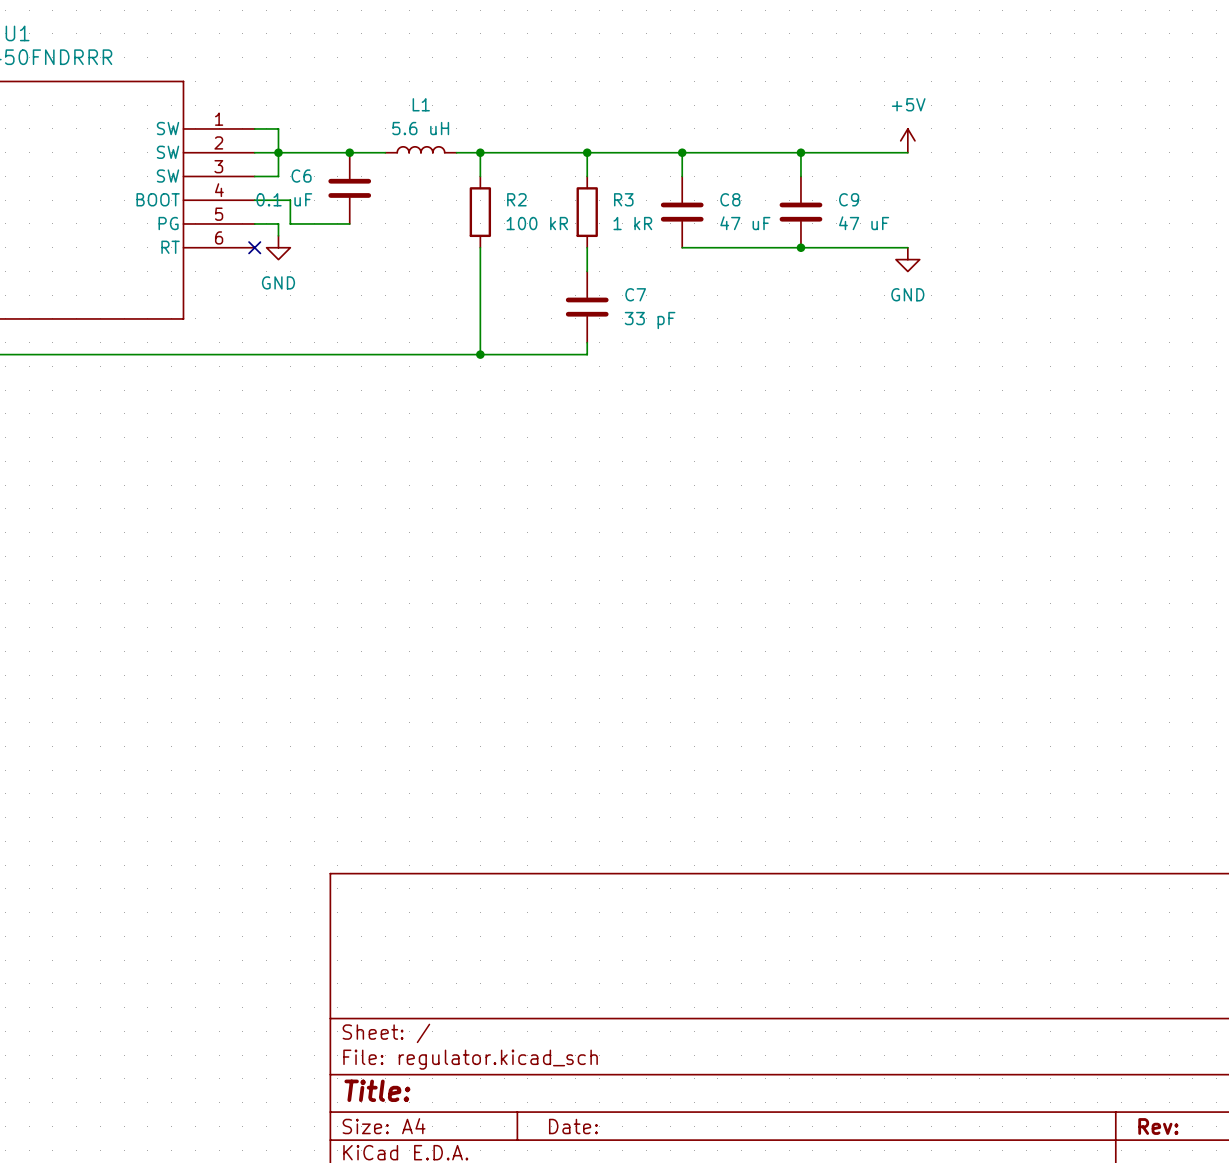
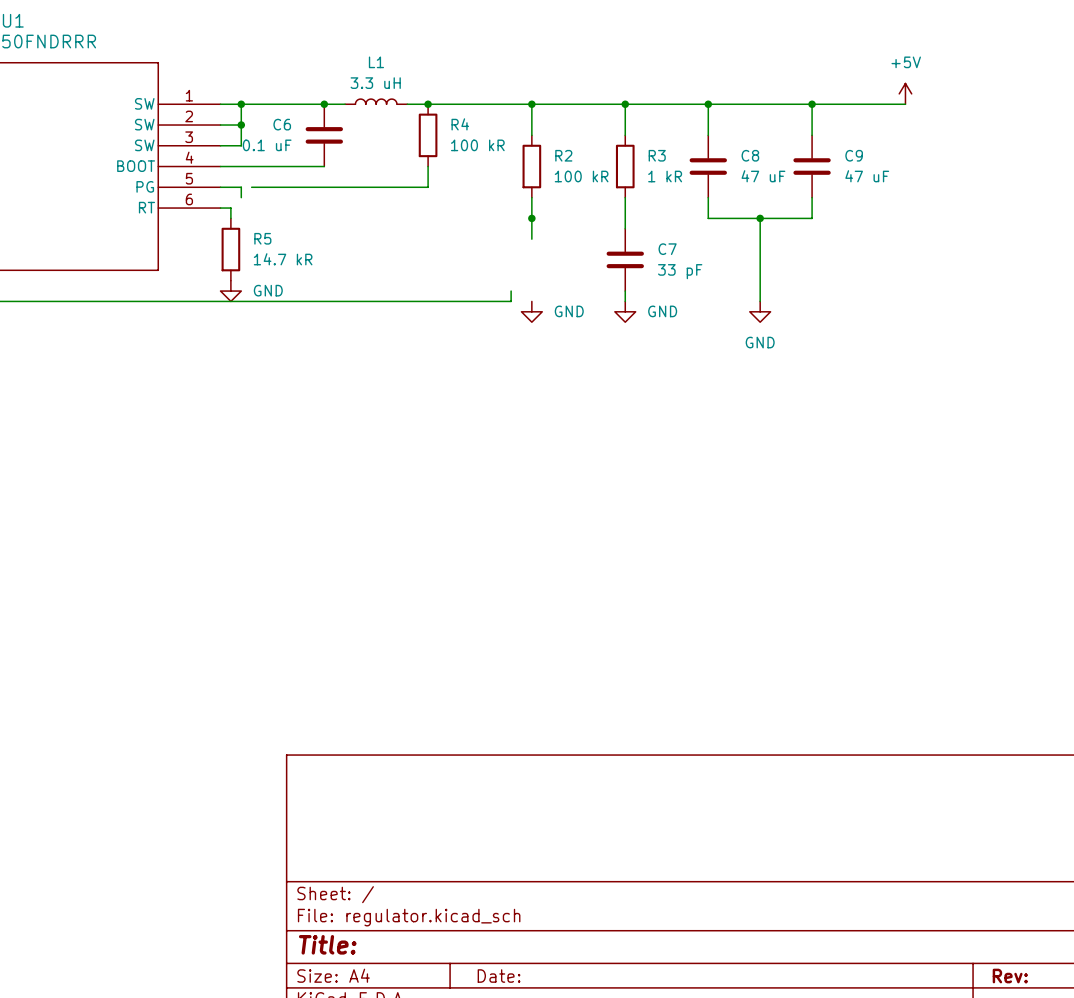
wire: none -> (241, 104) (345, 104)
junction: none -> (241, 104)
L1 value: 5.6 uH (420, 128) -> 3.3 uH (375, 83)
wire: none -> (407, 104) (905, 104)
wire: none -> (531, 104) (531, 135)
wire: none -> (625, 104) (625, 135)
junction: none -> (625, 104)
wire: none -> (708, 104) (708, 135)
wire: none -> (812, 104) (812, 135)
junction: none -> (812, 104)
power symbol position: +5V (907, 140) -> +5V (905, 93)
L1 position: (420, 149) -> (376, 101)
wire: (278, 152) (385, 152) -> none
junction position: (349, 152) -> (324, 104)
wire: (456, 152) (907, 152) -> none
wire: (480, 152) (480, 176) -> none
junction position: (480, 152) -> (428, 104)
wire: (587, 152) (587, 176) -> none
junction position: (587, 152) -> (531, 104)
wire: (682, 152) (682, 176) -> none
junction: (682, 152) -> none
wire: (800, 152) (800, 176) -> none
junction position: (800, 152) -> (708, 104)
R4: none -> 100 kR (428, 135)
C6 position: (349, 188) -> (324, 135)
wire: (290, 200) (290, 223) -> (251, 166) (324, 166)
wire: none -> (428, 166) (428, 187) (303, 187)
R2 position: (480, 212) -> (531, 166)
R3 position: (587, 212) -> (625, 166)
C8 position: (682, 212) -> (708, 166)
C9 position: (800, 212) -> (812, 166)
wire: none -> (531, 197) (531, 239)
wire: none -> (625, 197) (625, 228)
wire: none -> (708, 197) (708, 218) (812, 218) (812, 197)
wire: none -> (220, 208) (230, 208) (230, 218)
no-connect mark: (254, 247) -> none
power symbol position: GND (278, 247) -> GND (230, 291)
wire: (480, 247) (480, 354) -> none
wire: (587, 247) (587, 271) -> none
wire: (682, 247) (907, 247) -> none
junction: (800, 247) -> none
junction: none -> (531, 218)
wire: none -> (760, 218) (760, 301)
junction: none -> (760, 218)
power symbol: GND (907, 259) -> none
power symbol text position: GND (278, 282) -> GND (268, 290)
R5: none -> 14.7 kR (230, 249)
C7 position: (587, 307) -> (625, 259)
wire: none -> (625, 291) (625, 301)
junction: (480, 354) -> none
power symbol: none -> GND (531, 311)
power symbol: none -> GND (625, 311)
power symbol: none -> GND (760, 311)

